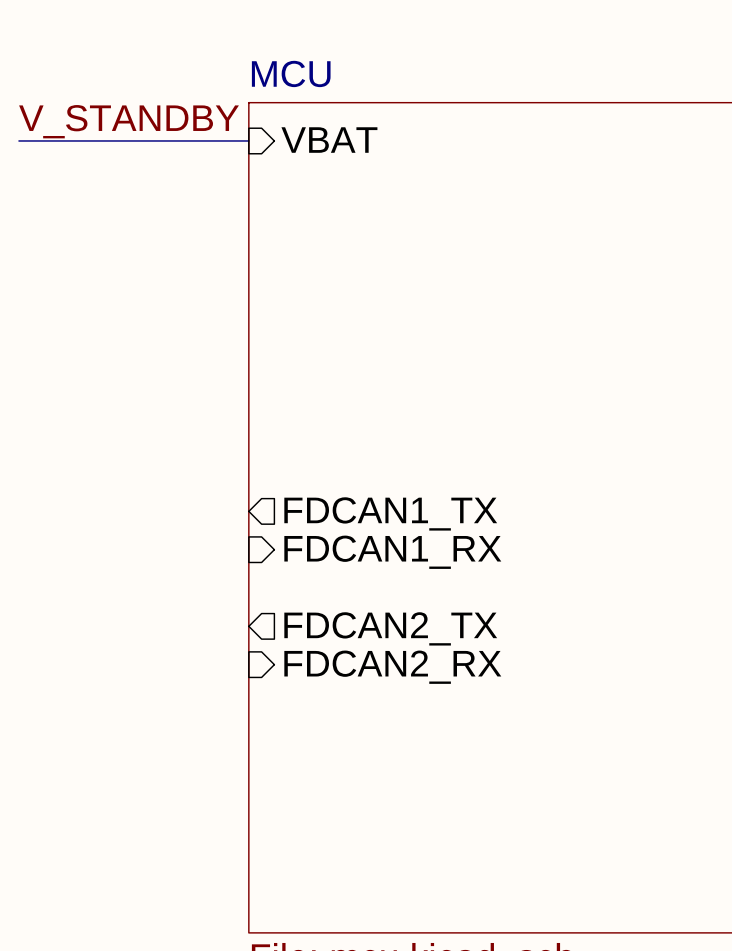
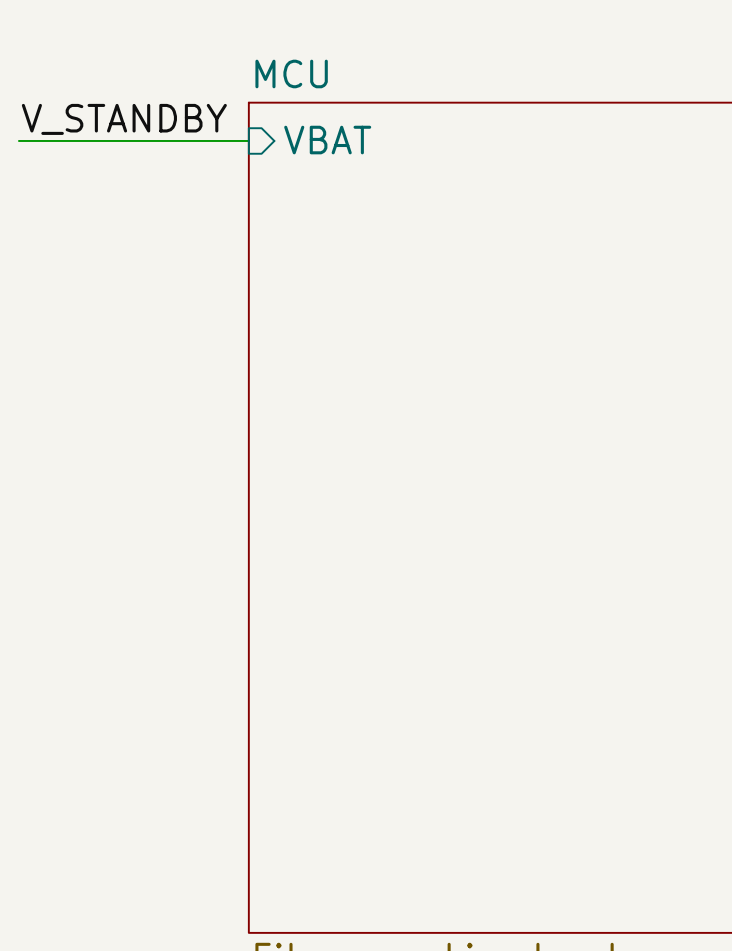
sheet pin: FDCAN1_TX (390, 513) -> none
sheet pin: FDCAN1_RX (392, 552) -> none
sheet pin: FDCAN2_TX (390, 628) -> none
sheet pin: FDCAN2_RX (392, 667) -> none

